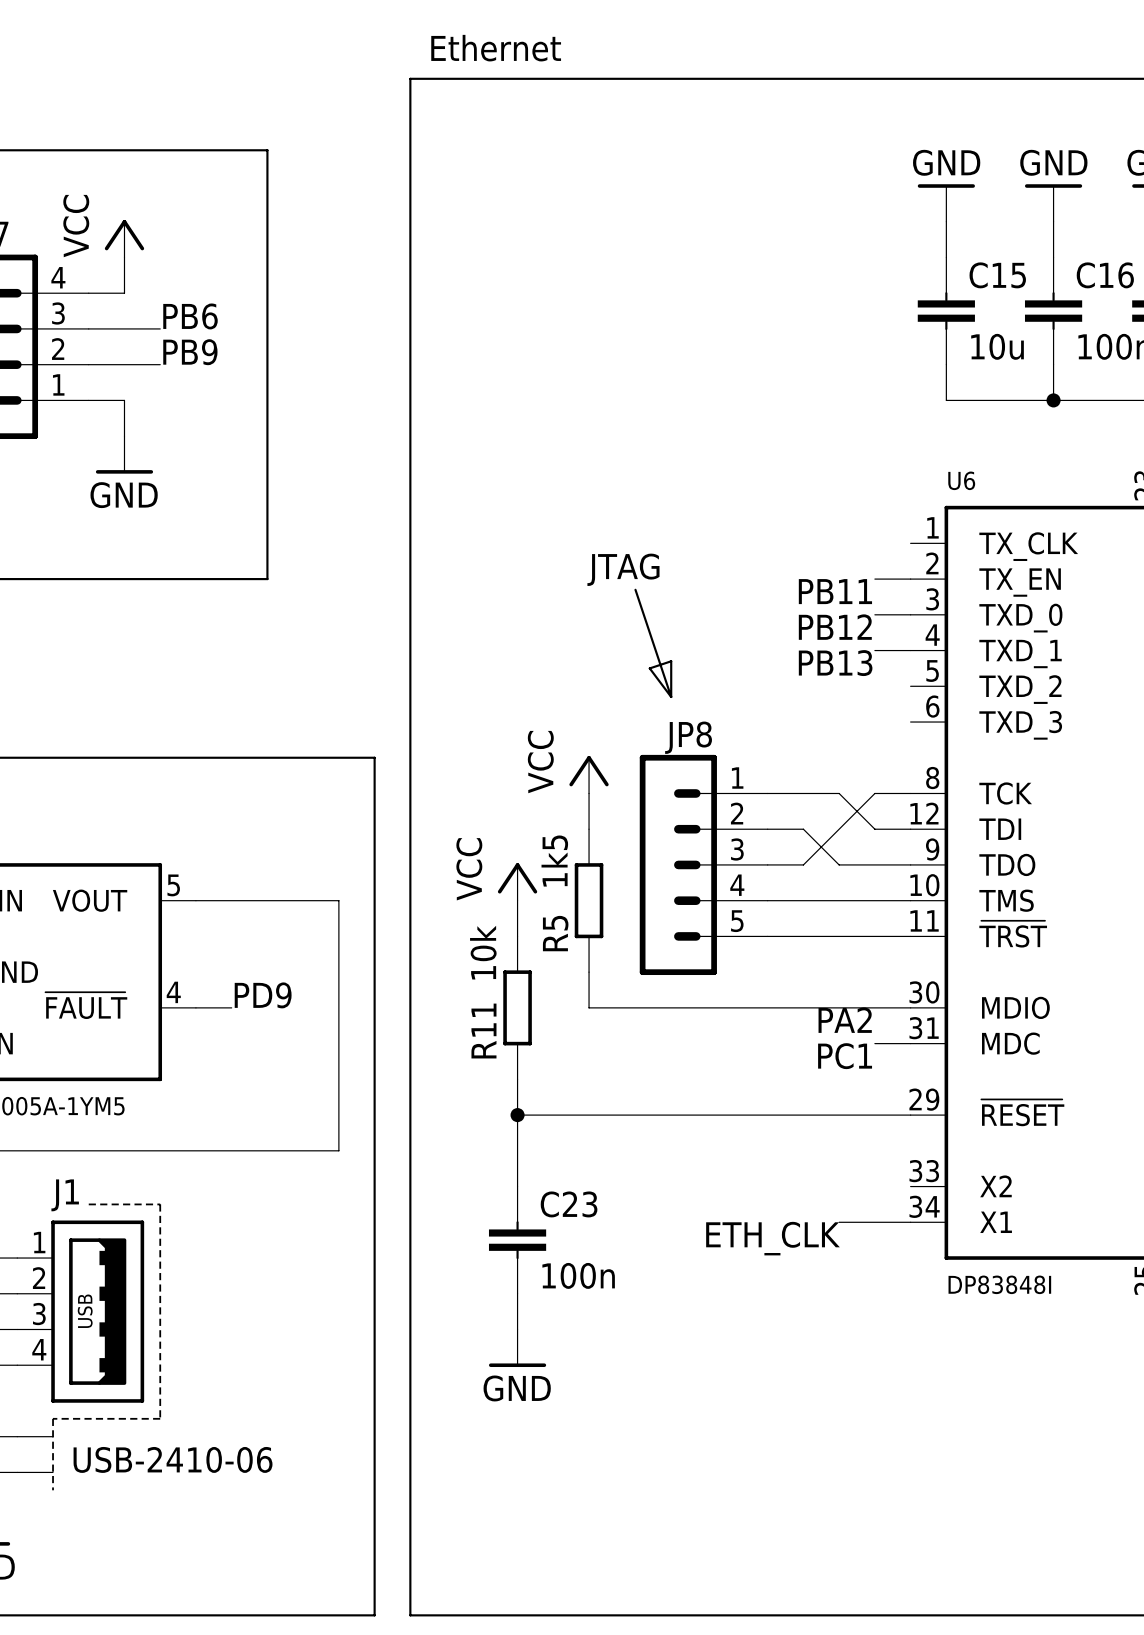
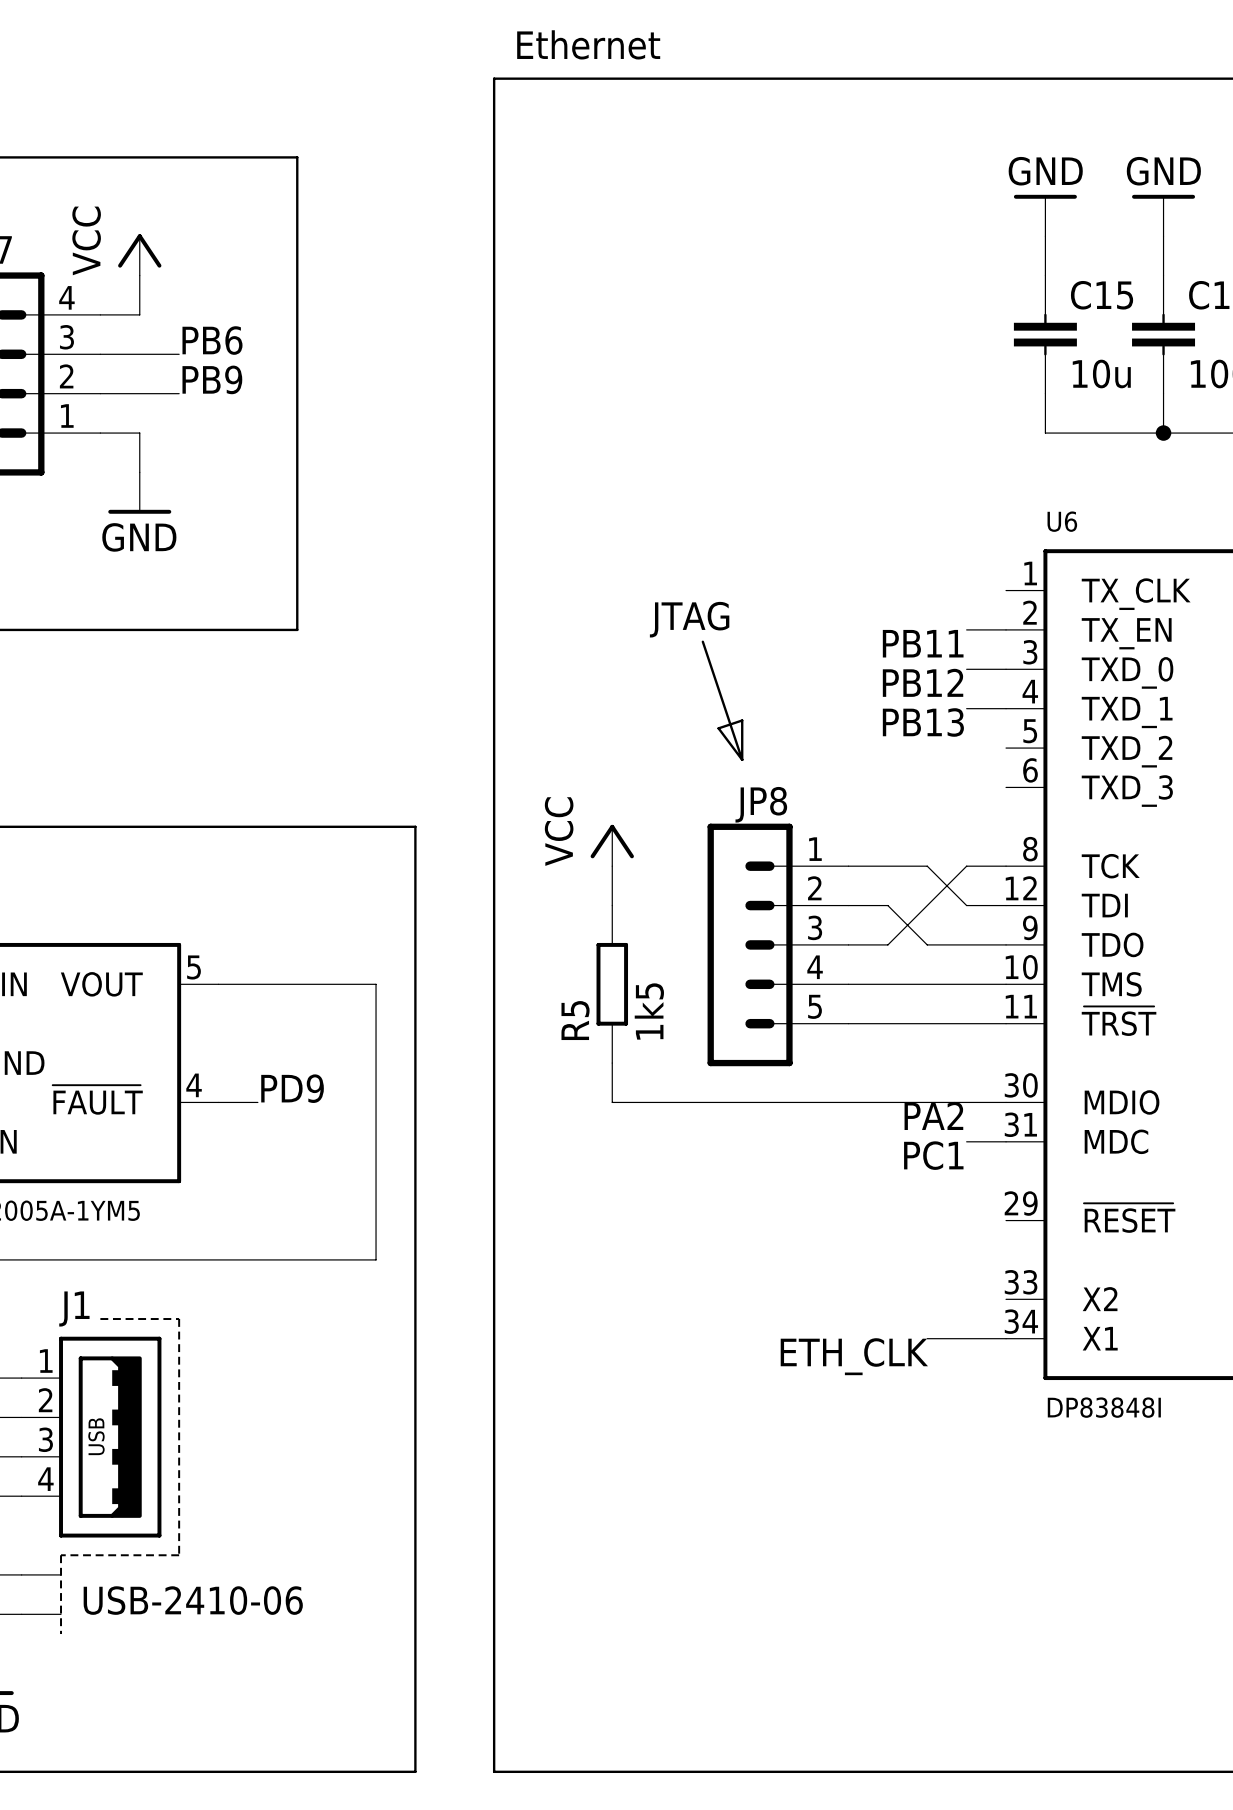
text position: Ethernet (496, 48) -> Ethernet (588, 44)
line: (446, 78) (410, 78) (410, 1615) (446, 1615) -> (494, 78) (494, 1771)
power symbol position: VCC (589, 774) -> VCC (612, 845)
wire: (589, 793) (589, 829) -> (612, 866) (612, 905)
R5 value position: 1k5 (554, 861) -> 1k5 (649, 1011)
power symbol: VCC (517, 881) -> none
wire: (517, 900) (517, 936) -> none
R5 position: (589, 900) -> (612, 984)
wire: (589, 972) (589, 1007) -> (612, 1063) (612, 1102) (651, 1102)
R11: 10k (517, 1007) -> none
wire: (517, 1079) (517, 1186) -> none
wire: (517, 1115) (910, 1115) -> none
junction: (517, 1115) -> none
C23: 100n (517, 1240) -> none
wire: (517, 1293) (517, 1329) -> none
power symbol: GND (517, 1348) -> none

